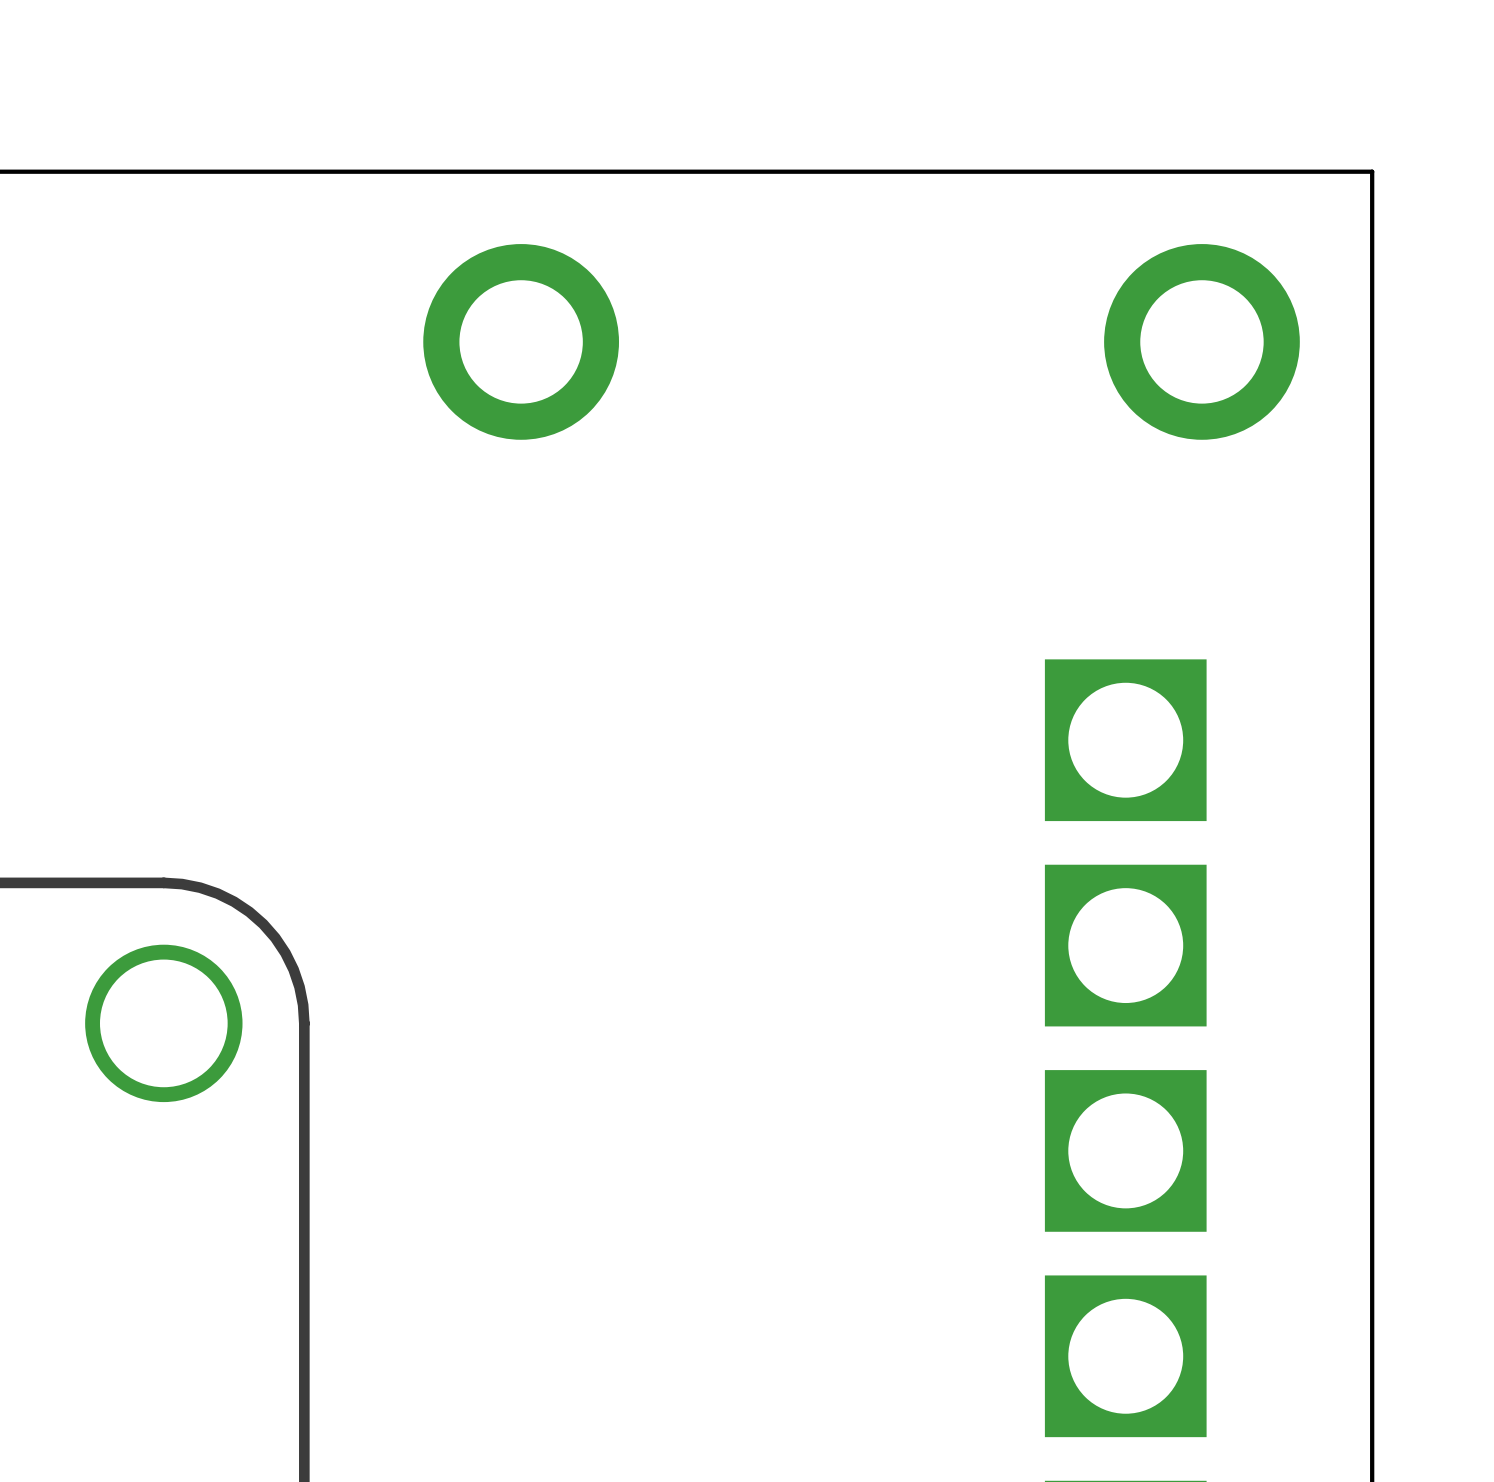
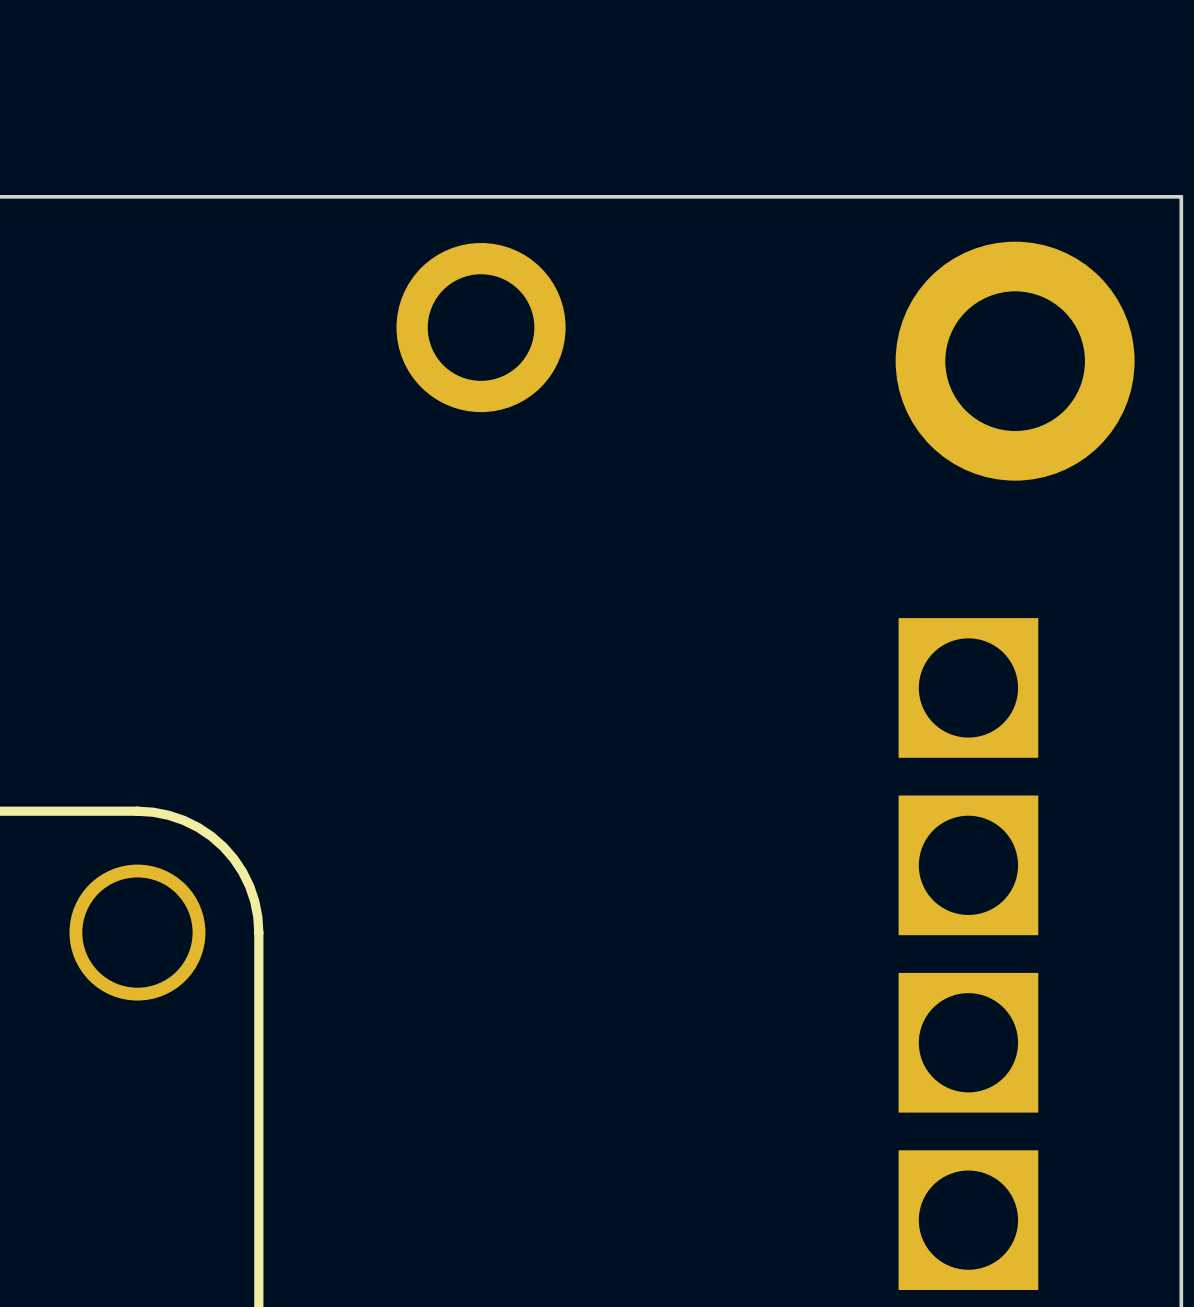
part footprint: [1104, 244, 1300, 440] -> [895, 241, 1135, 481]
part position: (521, 341) -> (481, 327)

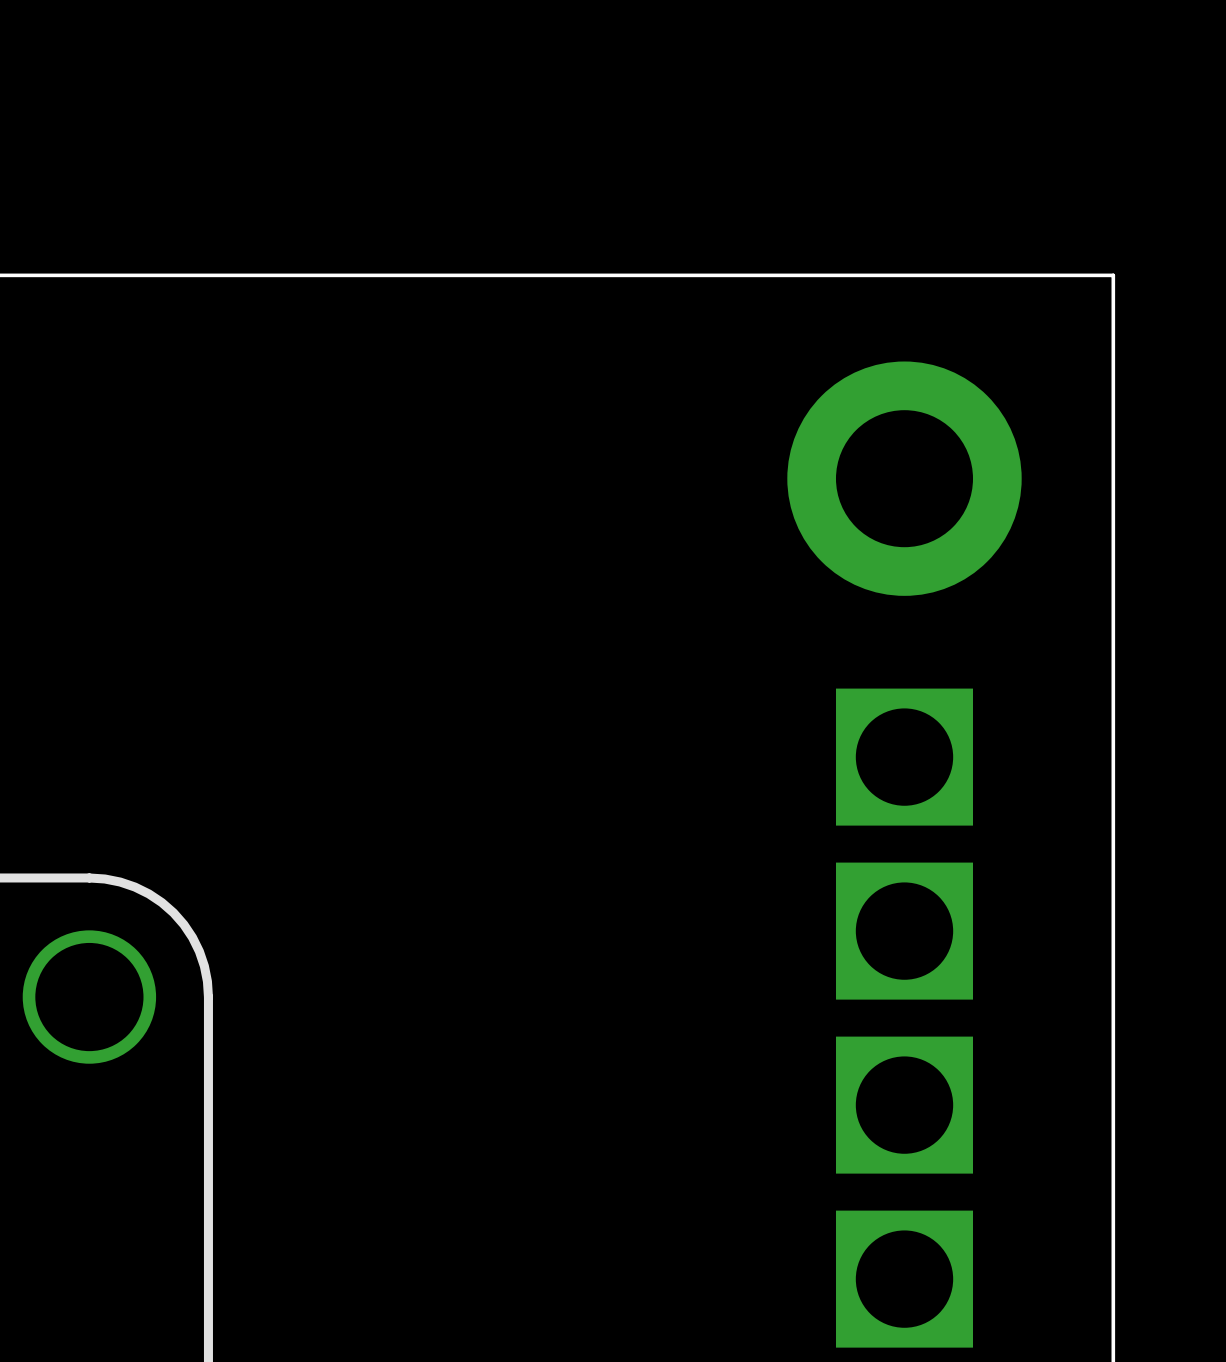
part: (481, 327) -> none
part position: (1015, 361) -> (904, 478)

